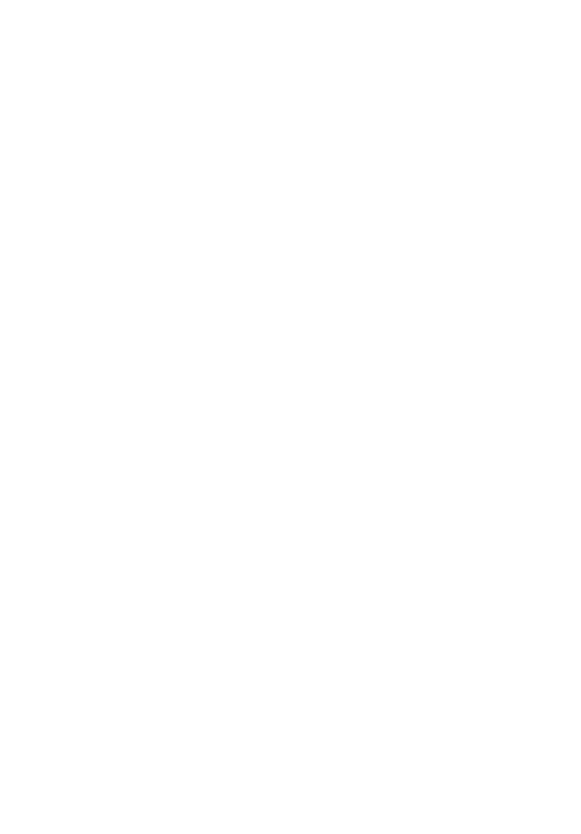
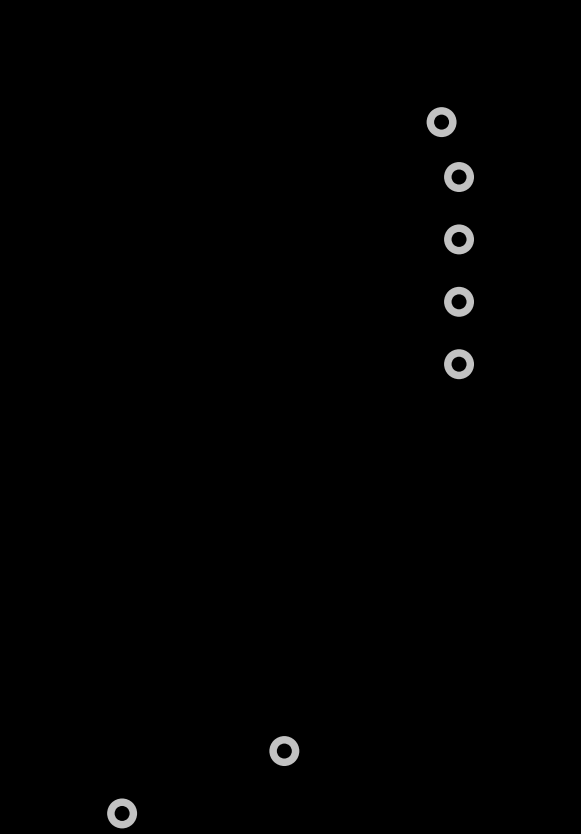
via: none -> (441, 122)
via: none -> (459, 177)
via: none -> (459, 239)
via: none -> (459, 301)
via: none -> (459, 364)
via: none -> (284, 751)
via: none -> (122, 813)

